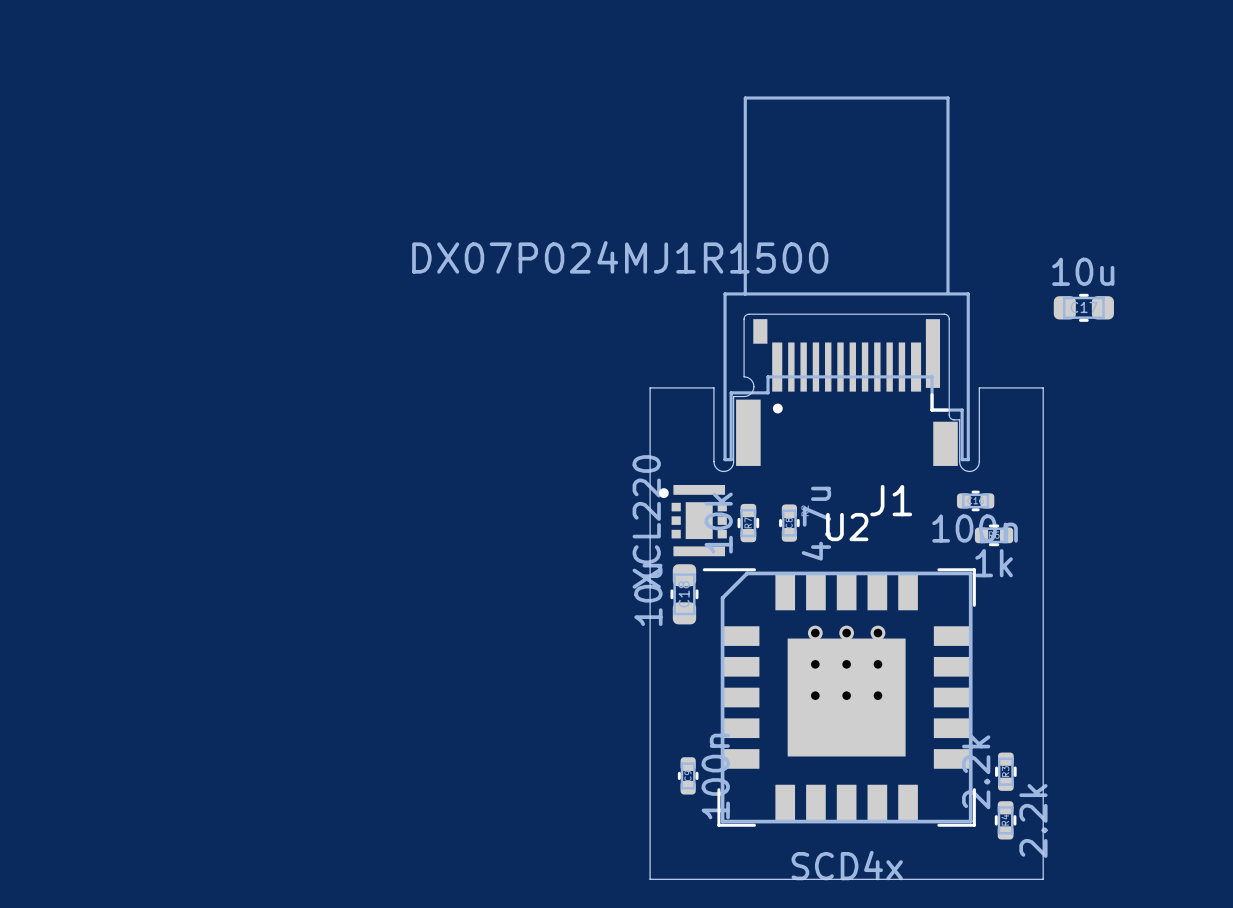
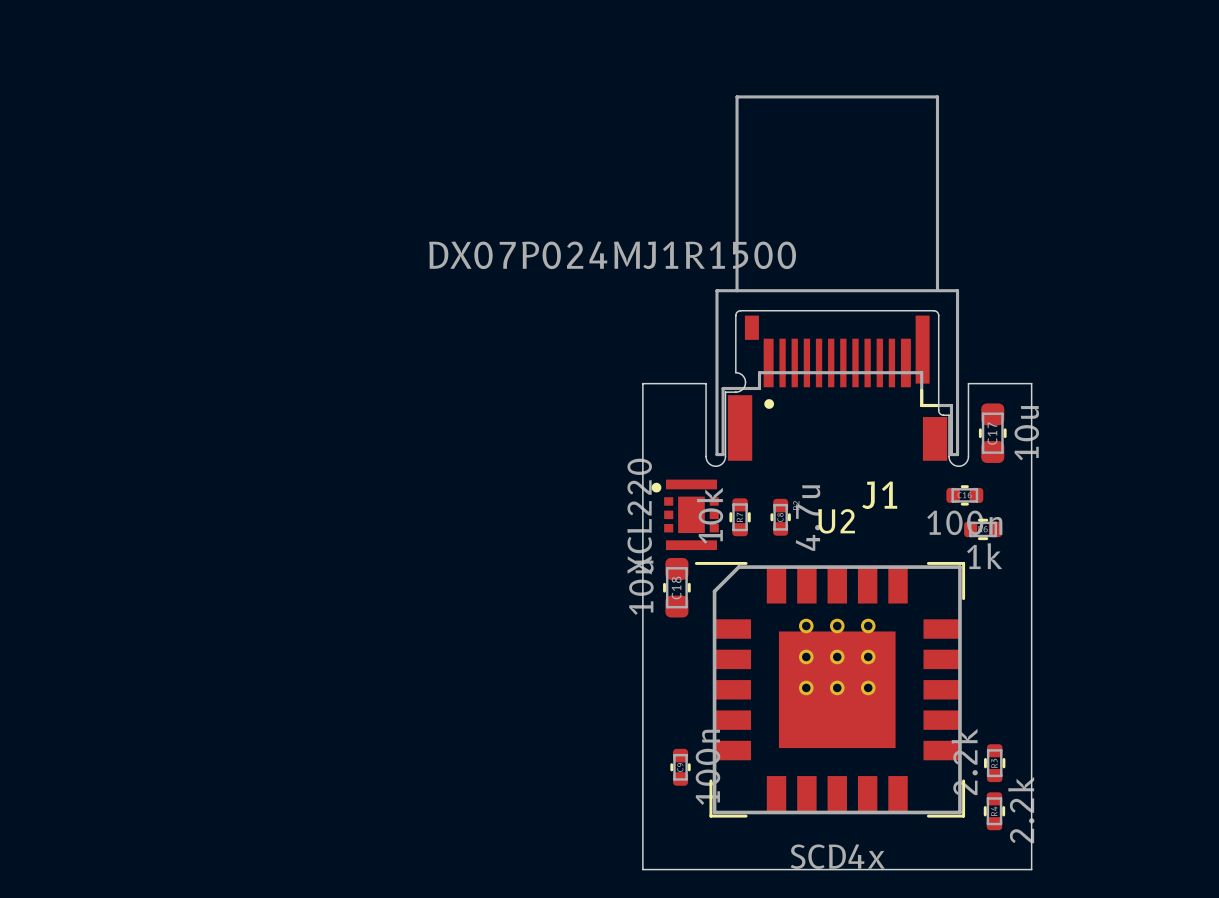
C17 rotation: 0° (1083, 307) -> 90° clockwise (992, 433)
C17 position: (1083, 307) -> (992, 433)

